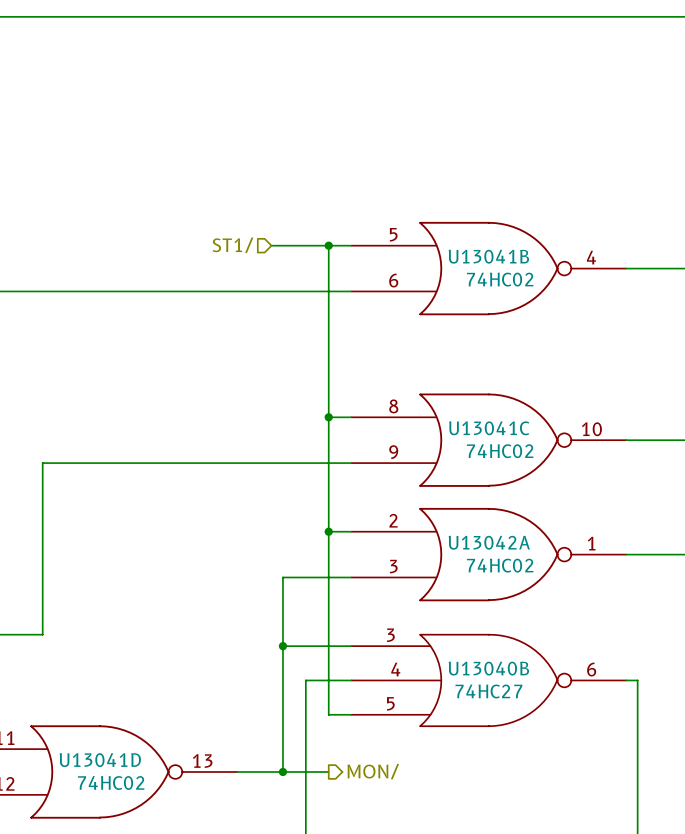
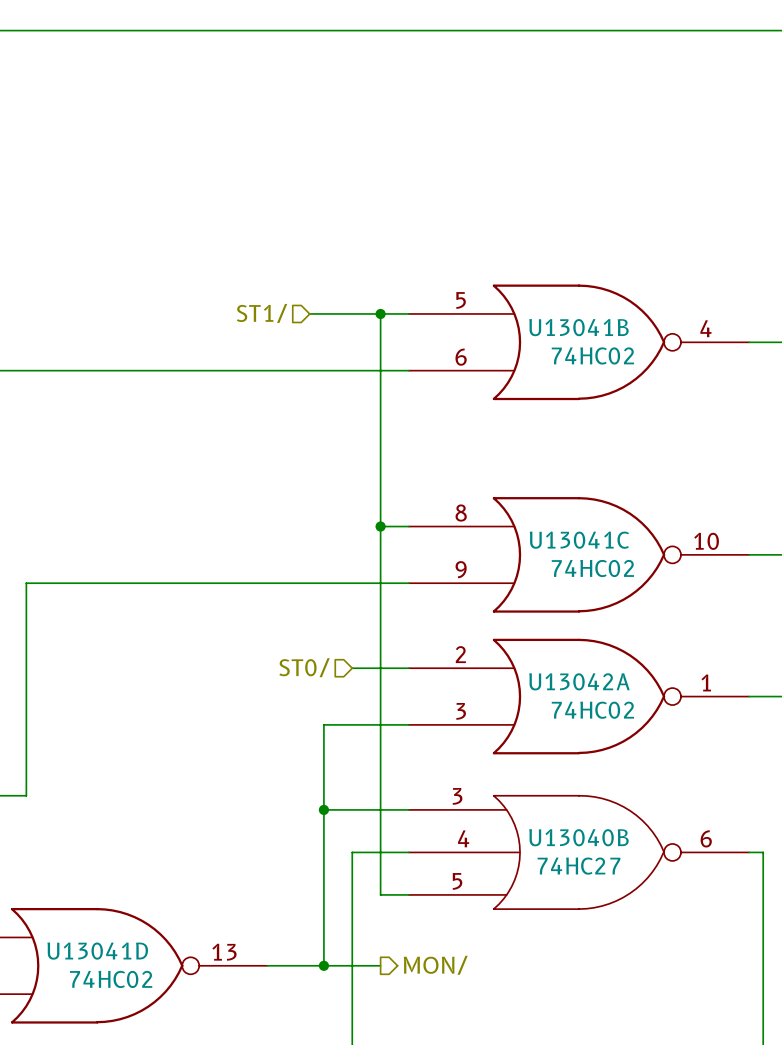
hierarchical label: none -> ST0/ (304, 667)
wire: none -> (352, 668) (380, 668)
junction: (328, 531) -> none

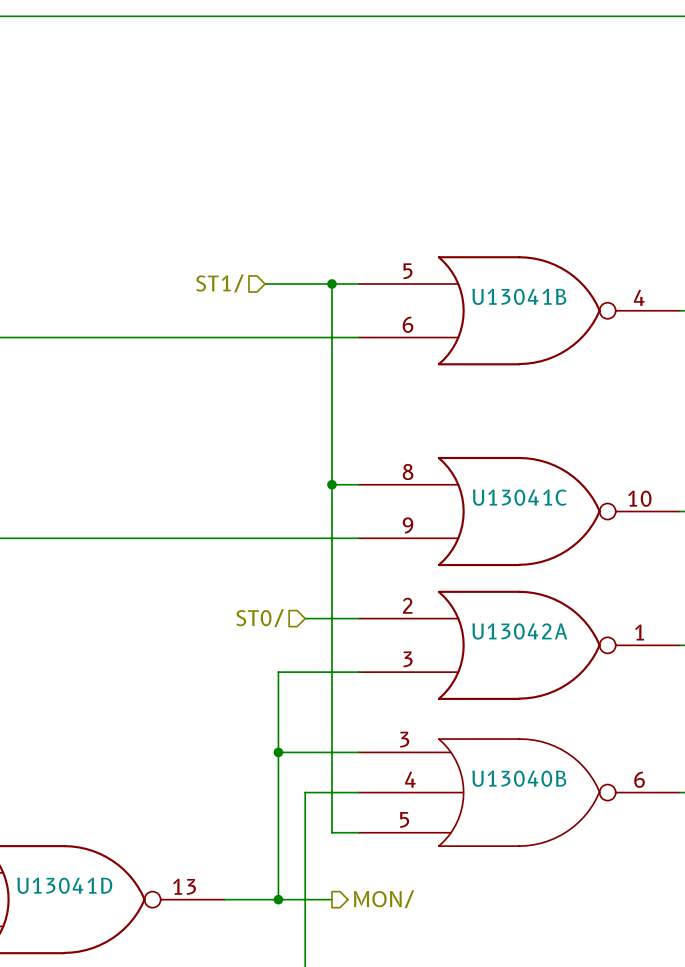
U13041B value: 74HC02 (592, 355) -> none
U13041C value: 74HC02 (592, 568) -> none
U13042A value: 74HC02 (592, 710) -> none
U13040B value: 74HC27 (578, 866) -> none
U13041D value: 74HC02 (111, 979) -> none

